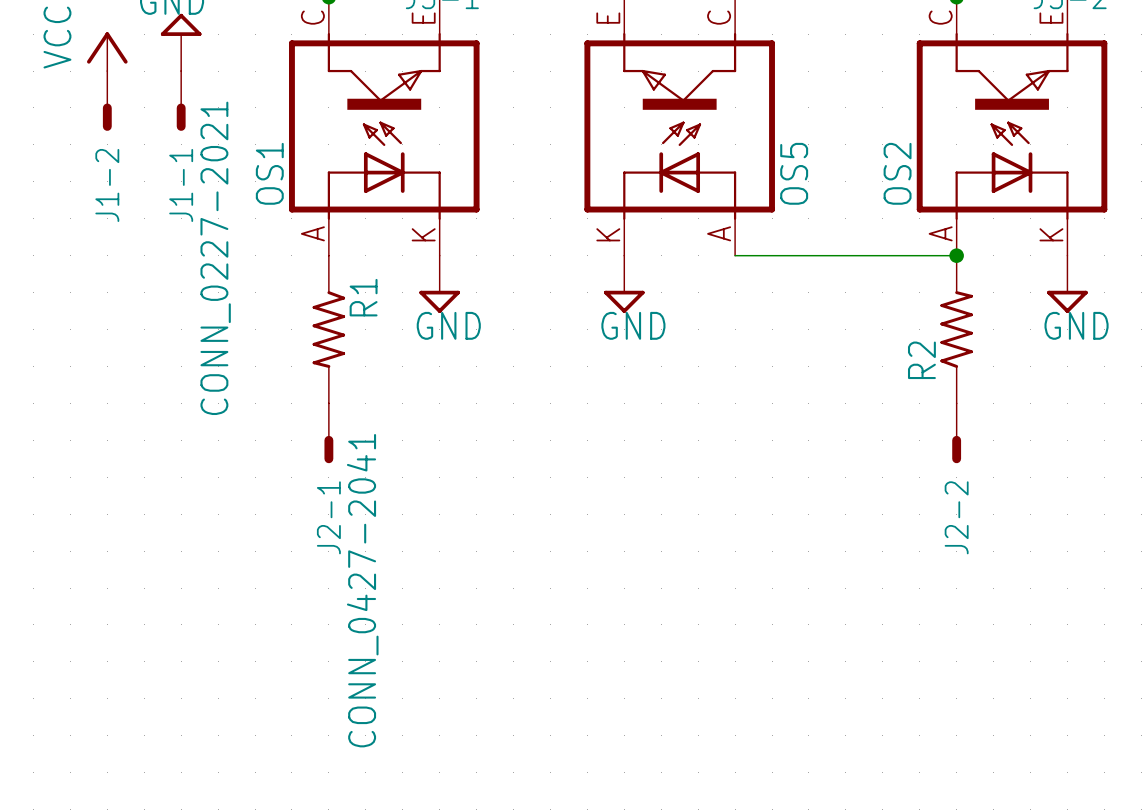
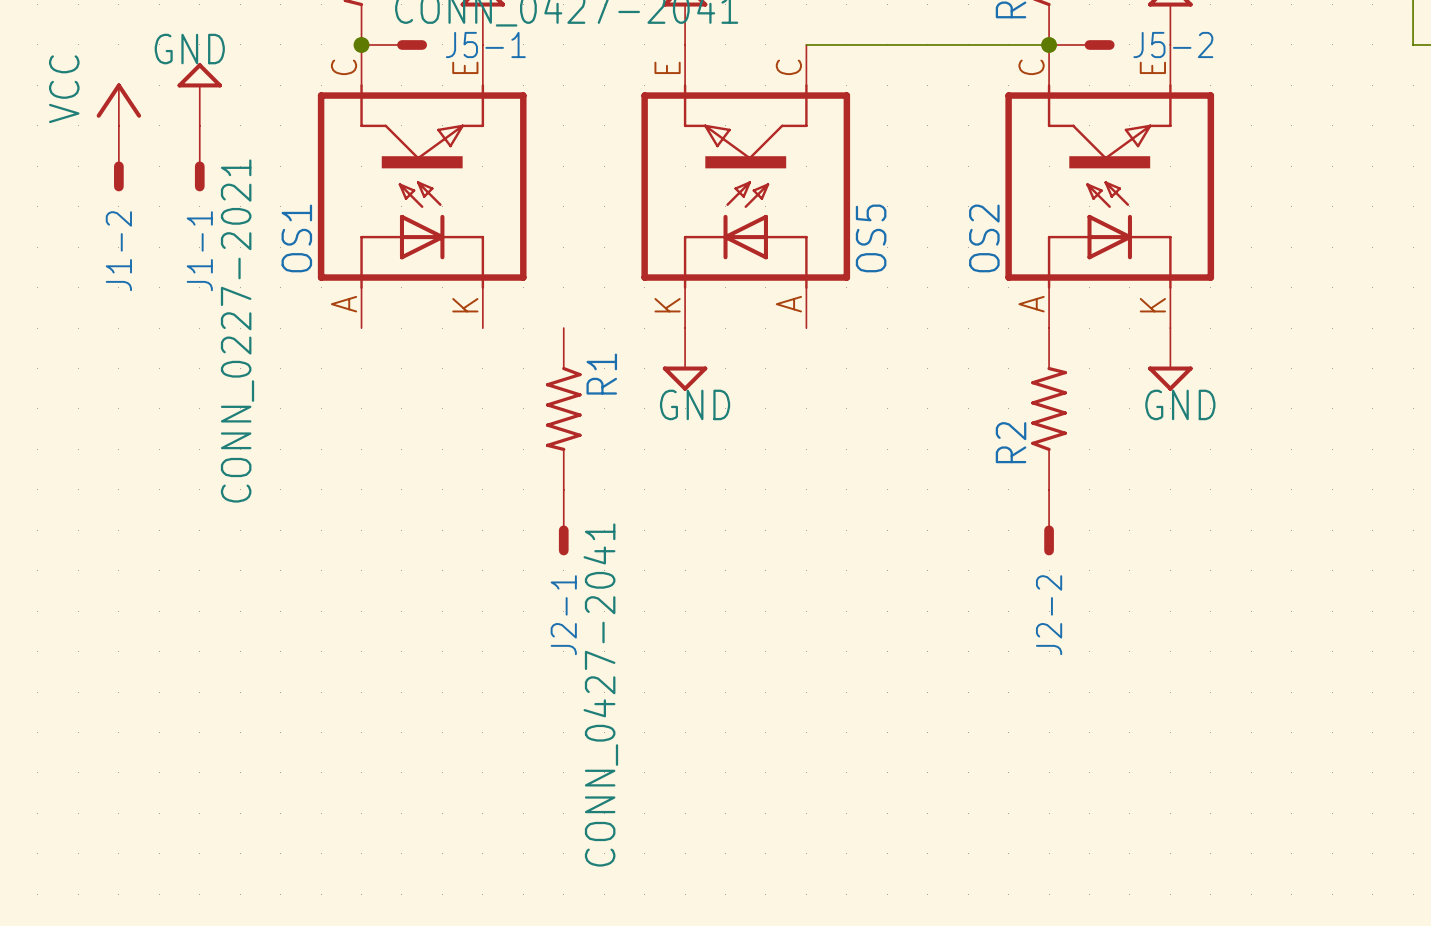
wire: (735, 255) (956, 255) -> none
junction: (956, 255) -> none
power symbol: GND (439, 284) -> none
R1 position: (328, 329) -> (563, 408)
J2-1 position: (328, 433) -> (563, 522)

